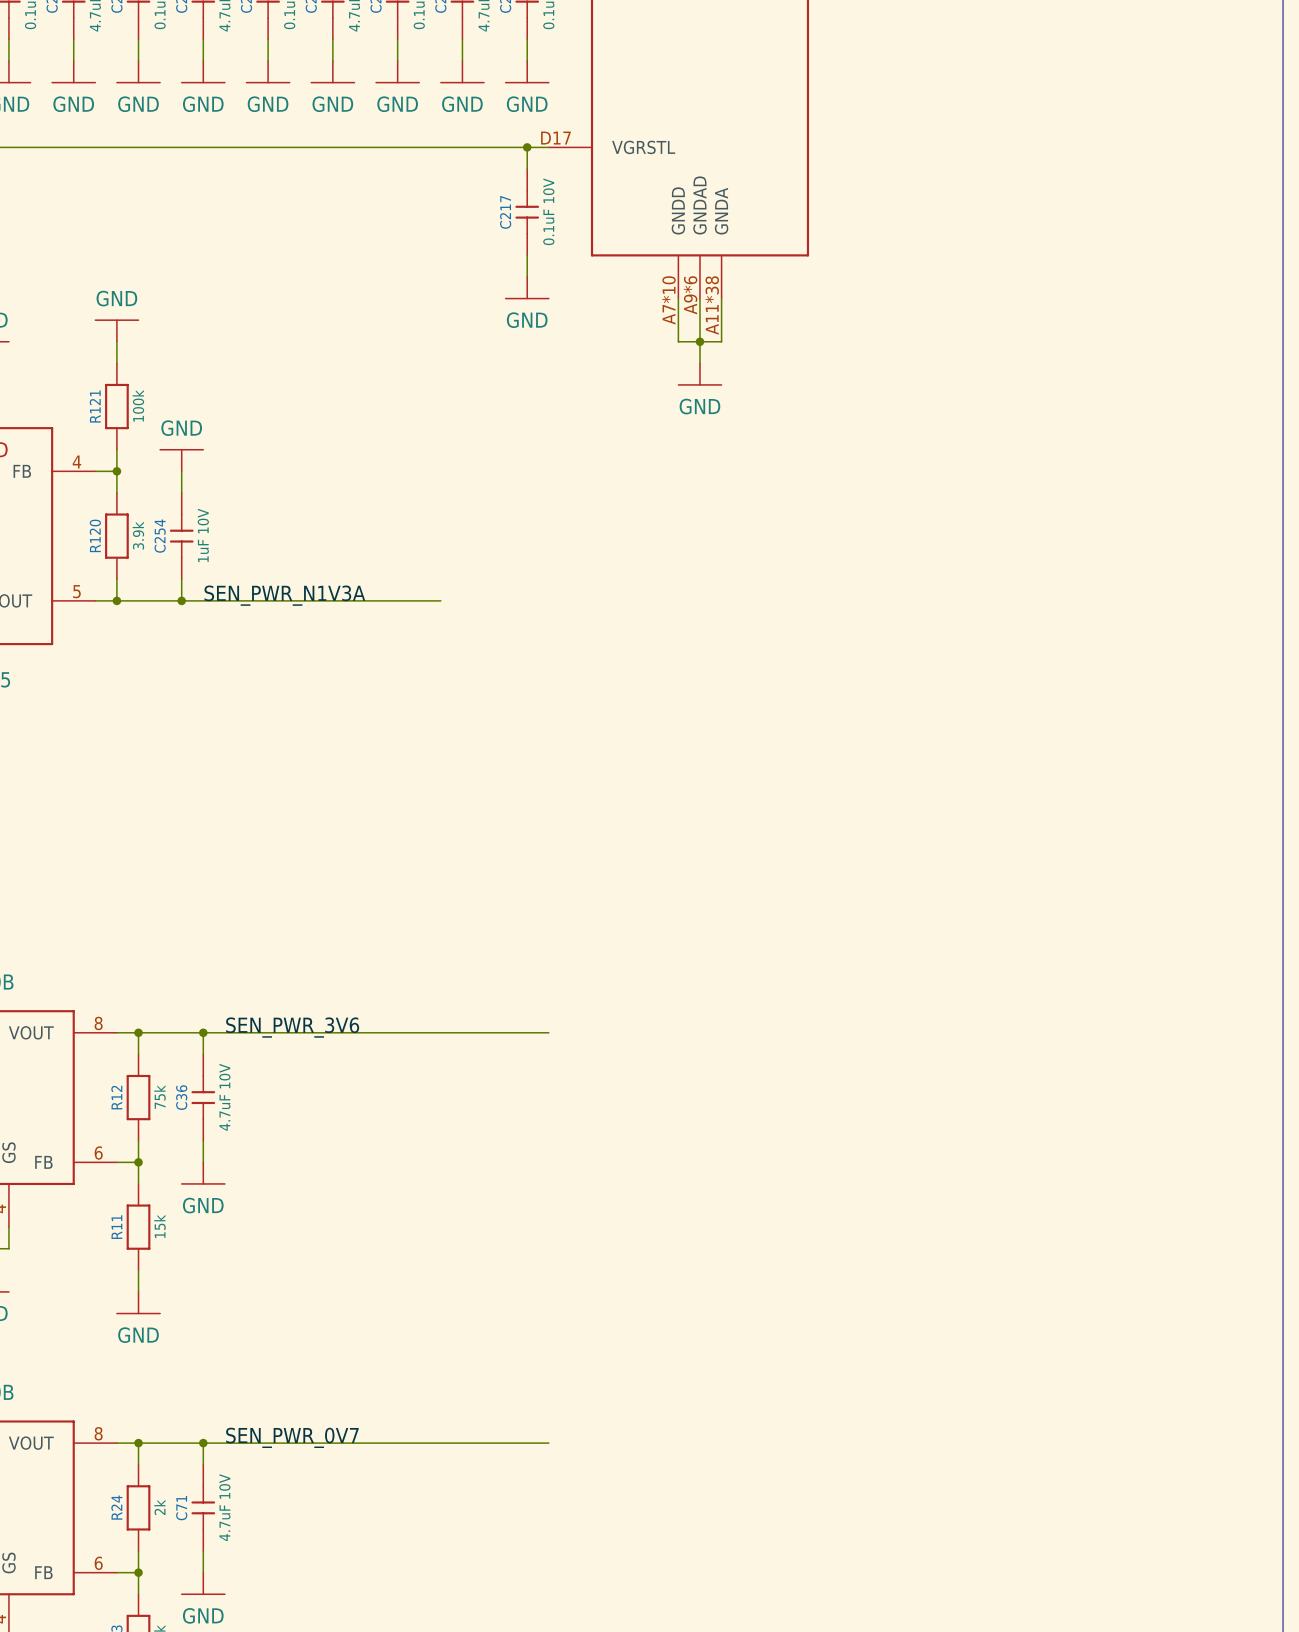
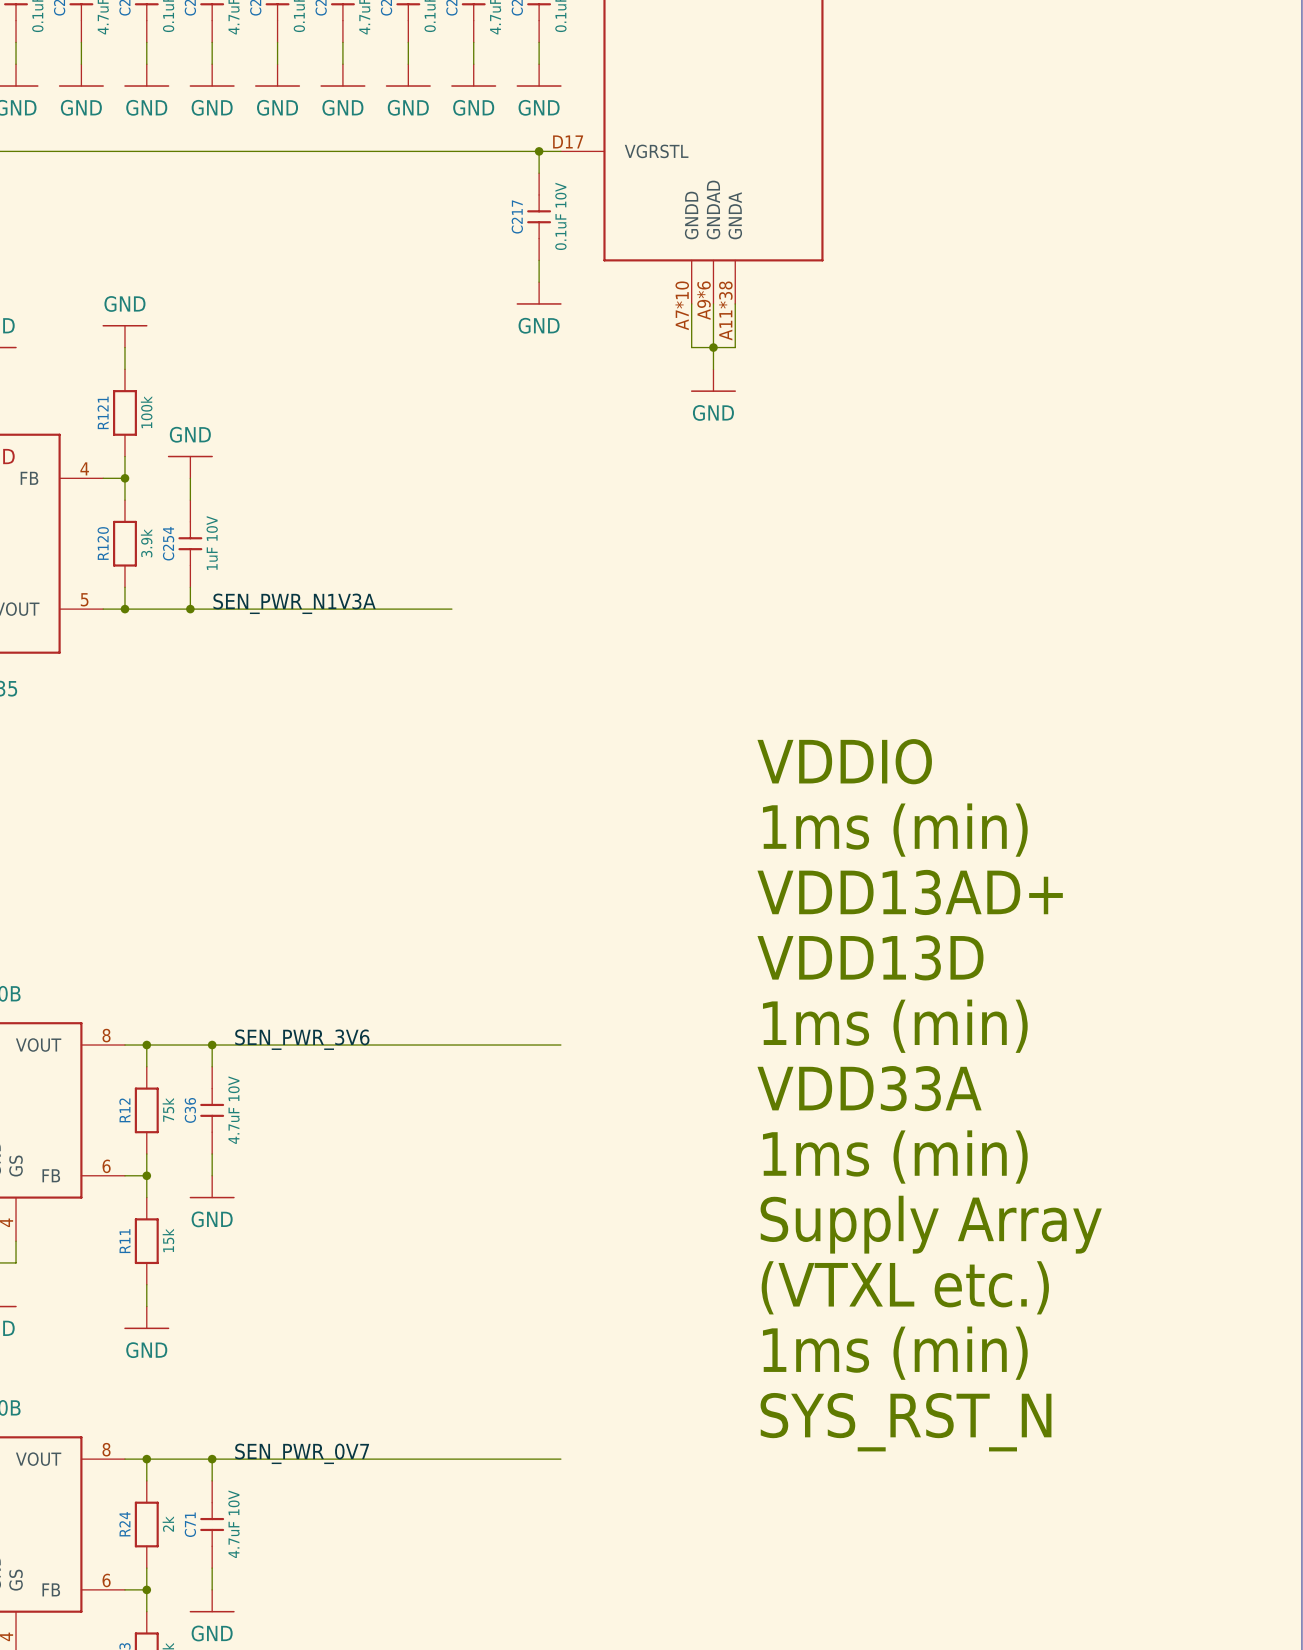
text: none -> VDDIO (844, 761)
text: none -> 1ms (min) (895, 830)
text: none -> VDD13AD+ (910, 892)
text: none -> VDD13D (870, 957)
text: none -> 1ms (min) (895, 1026)
text: none -> VDD33A (869, 1088)
text: none -> 1ms (min) (895, 1157)
text: none -> Supply Array (931, 1224)
text: none -> (VTXL etc.) (905, 1287)
text: none -> 1ms (min) (895, 1353)
text: none -> SYS_RST_N (906, 1422)

